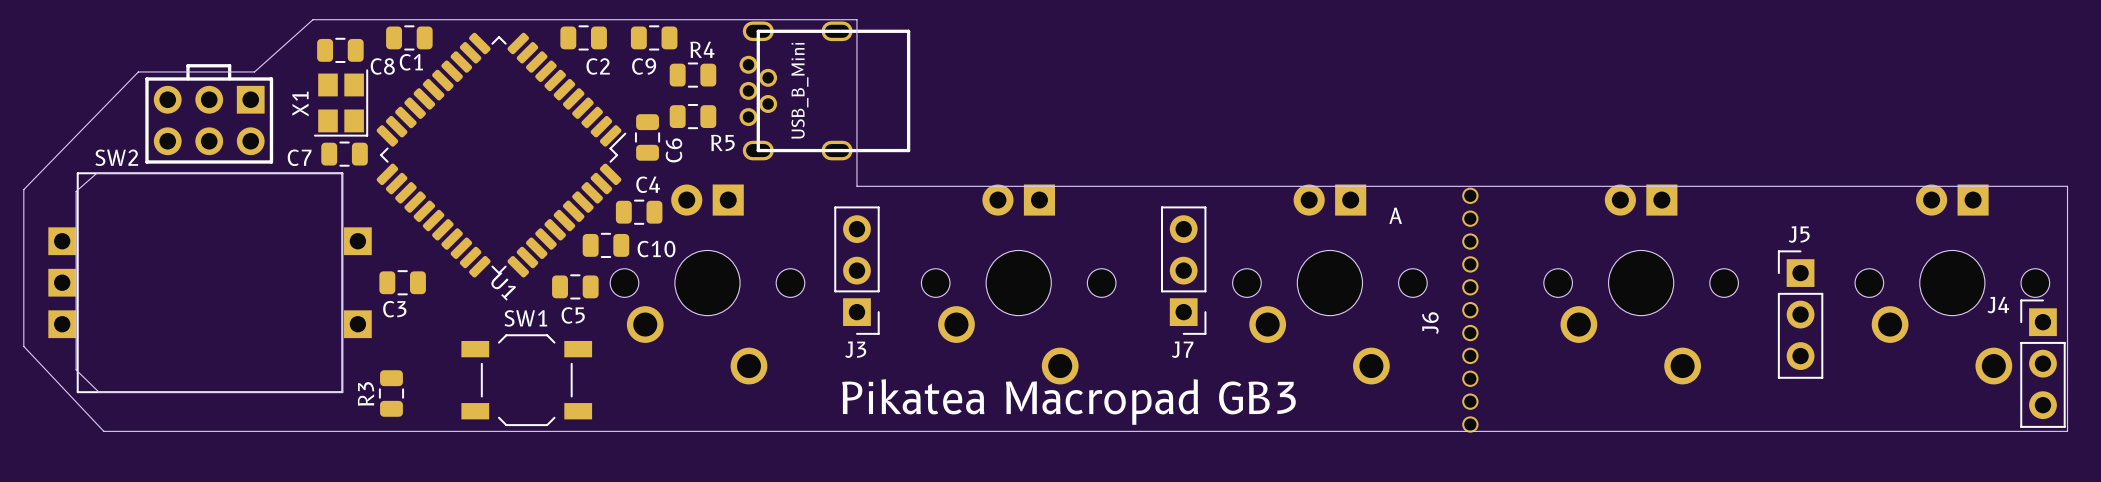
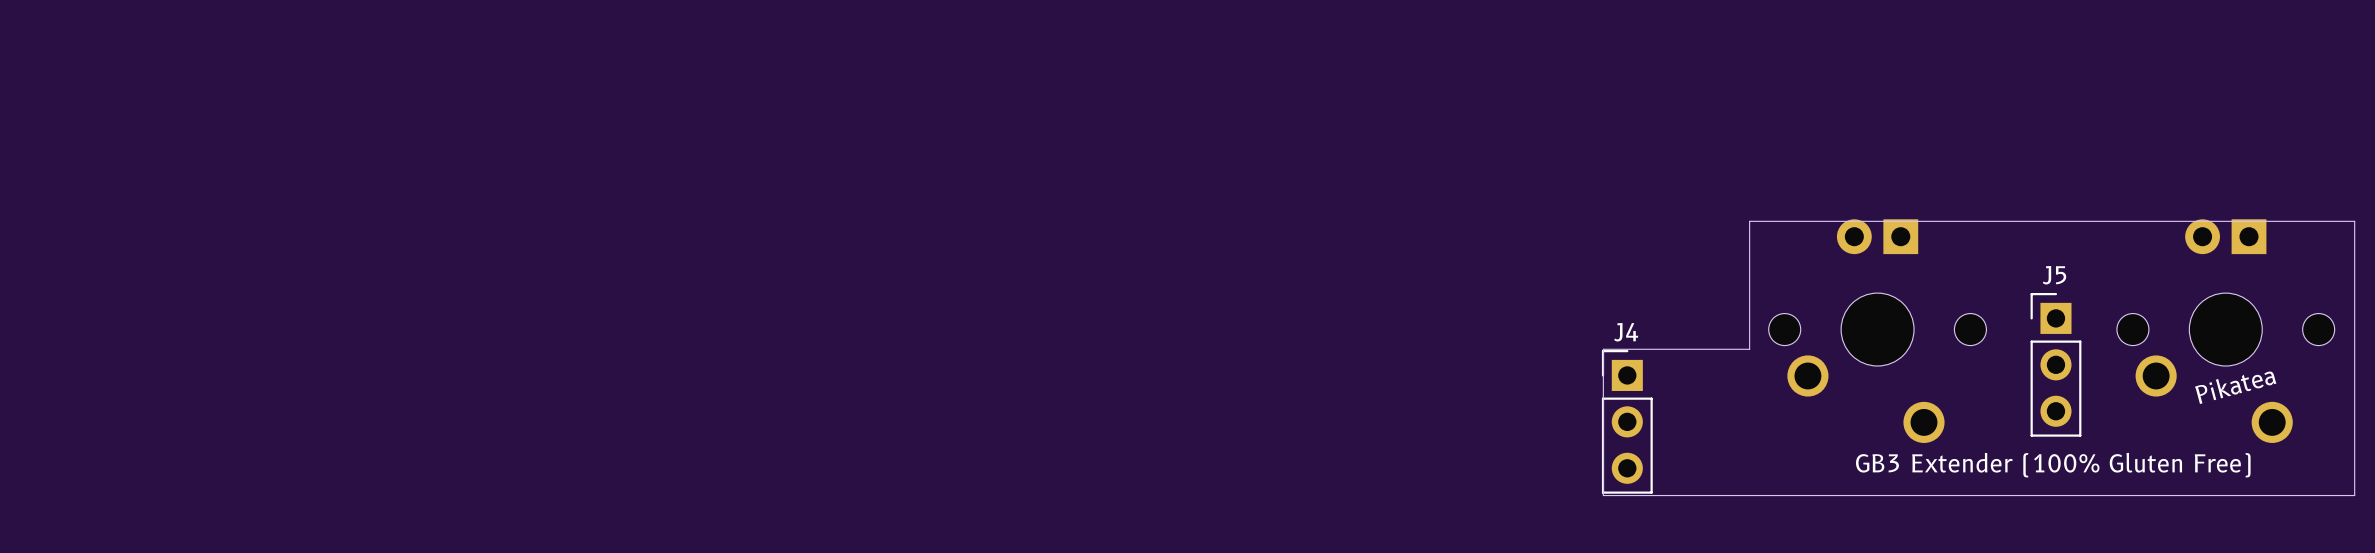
C1: (409, 37) -> none
C2: (583, 37) -> none
C9: (654, 37) -> none
C8: (340, 50) -> none
R4: (692, 75) -> none
part: USB_B_Mini (824, 90) -> none
X1: (341, 102) -> none
part: (209, 113) -> none
R5: (692, 116) -> none
C6: (647, 137) -> none
C7: (344, 154) -> none
U1: (501, 155) -> none
board edge: (96, 173) (76, 191) (76, 369) (98, 392) (342, 392) (342, 173) (96, 173) -> none
board edge: (1526, 186) (856, 186) (856, 19) (312, 19) (254, 71) (138, 71) (23, 189) (23, 346) (103, 431) (1396, 431) -> (1749, 221) (1749, 349) (1603, 349) (1603, 495)
C4: (639, 212) -> none
text: A (1395, 215) -> none
C10: (605, 245) -> none
J3: (856, 270) -> none
J7: (1183, 270) -> none
SW2: (210, 282) -> none
C3: (402, 282) -> none
part: (707, 284) -> none
part: (1018, 284) -> none
part: (1329, 284) -> none
C5: (575, 286) -> none
J4 name position: J4 (1998, 305) -> J4 (1626, 332)
J6: (1470, 310) -> none
text: none -> Pikatea (2235, 387)
J4 position: (2042, 363) -> (1627, 421)
SW1: (526, 380) -> none
R3: (391, 393) -> none
text: Pikatea Macropad GB3 (1068, 402) -> none
text: none -> GB3 Extender (100% Gluten Free) (2053, 465)

